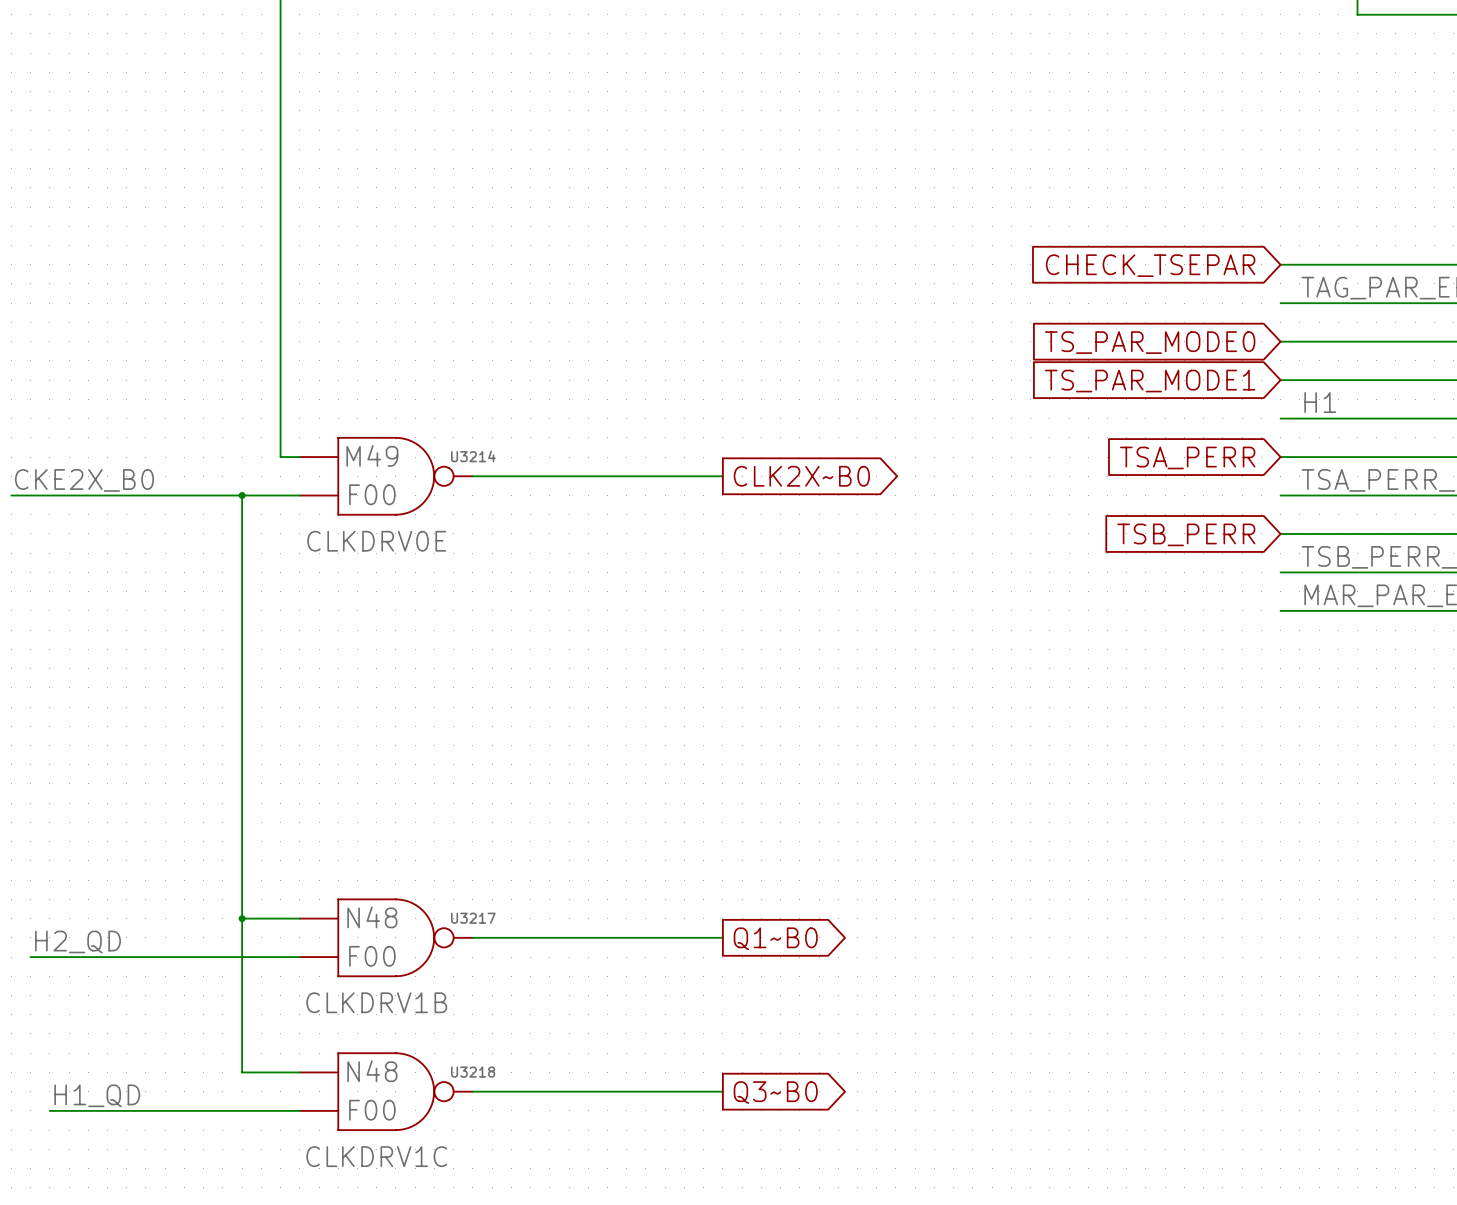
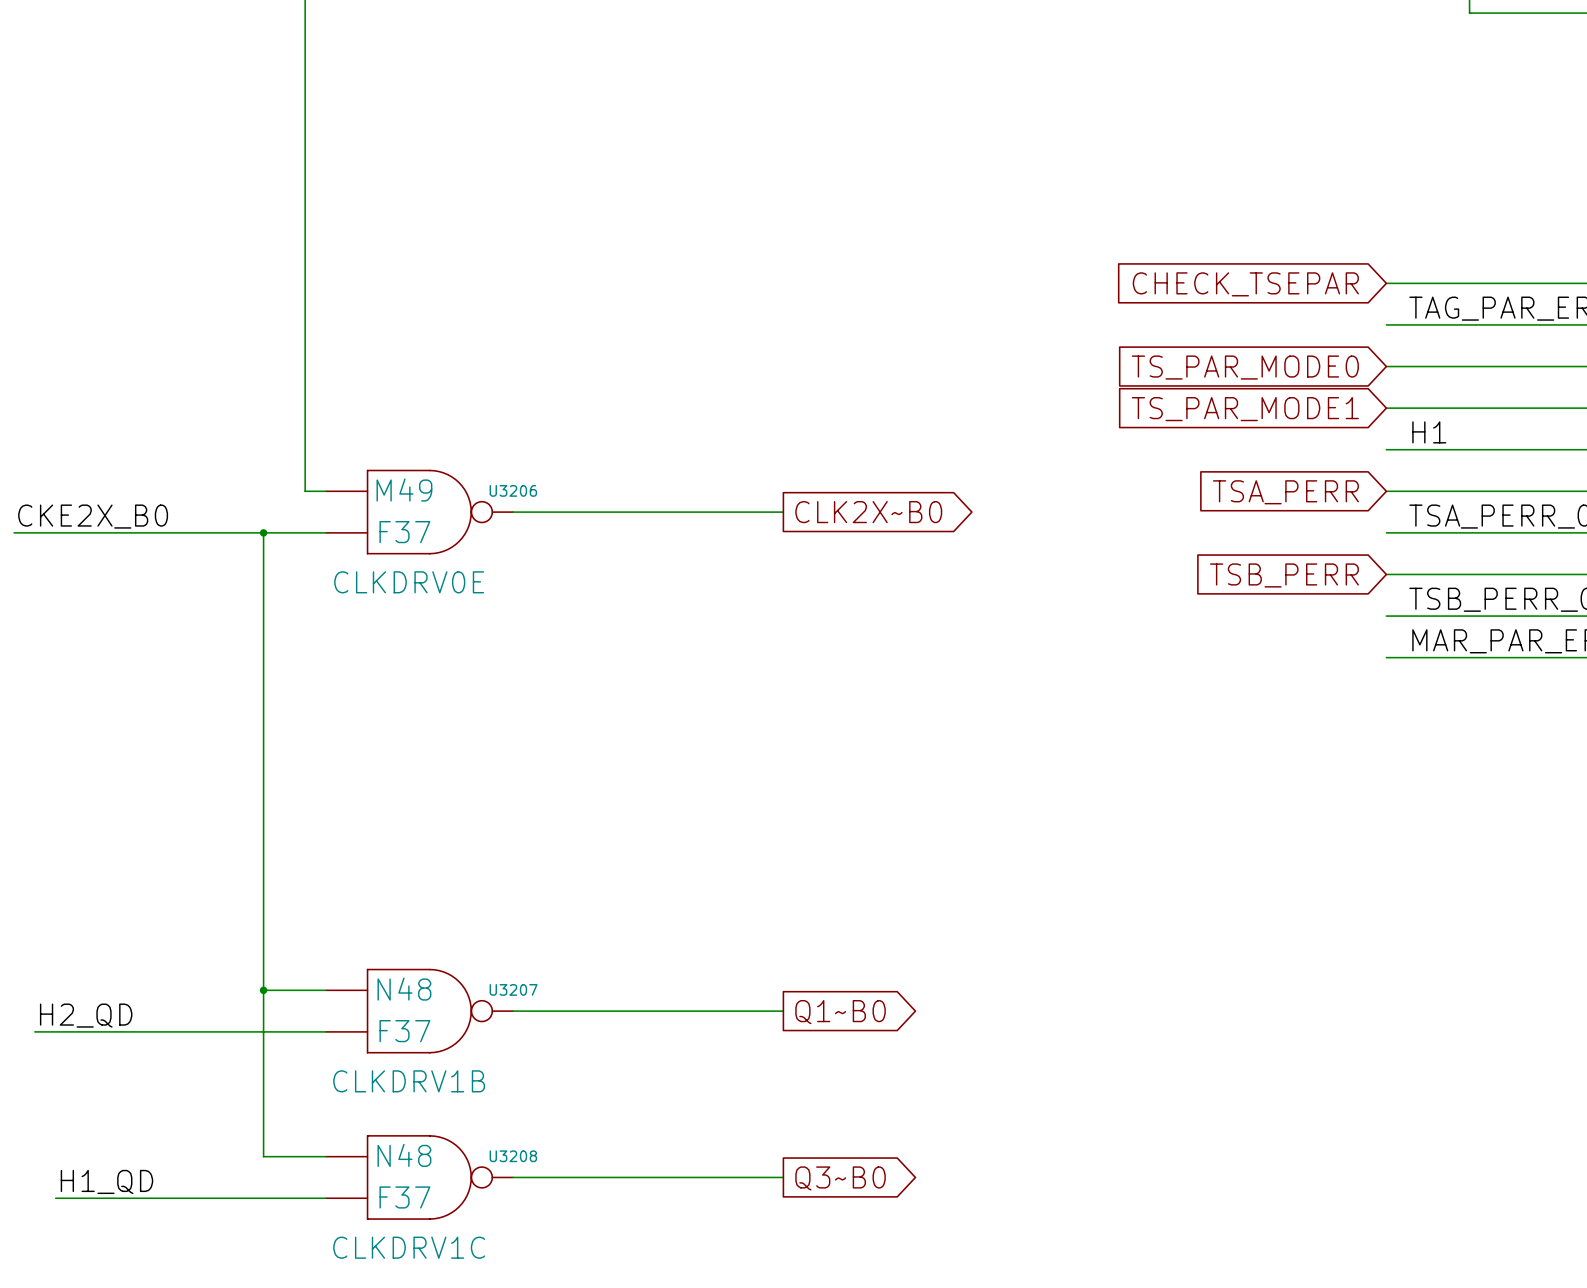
U3214 name: U3214 (473, 456) -> U3206 (513, 490)
U3214 value: F00 (372, 494) -> F37 (404, 532)
U3217 name: U3217 (473, 918) -> U3207 (513, 989)
U3217 value: F00 (372, 956) -> F37 (404, 1031)
U3218 name: U3218 (473, 1072) -> U3208 (513, 1156)
U3218 value: F00 (372, 1110) -> F37 (404, 1197)

